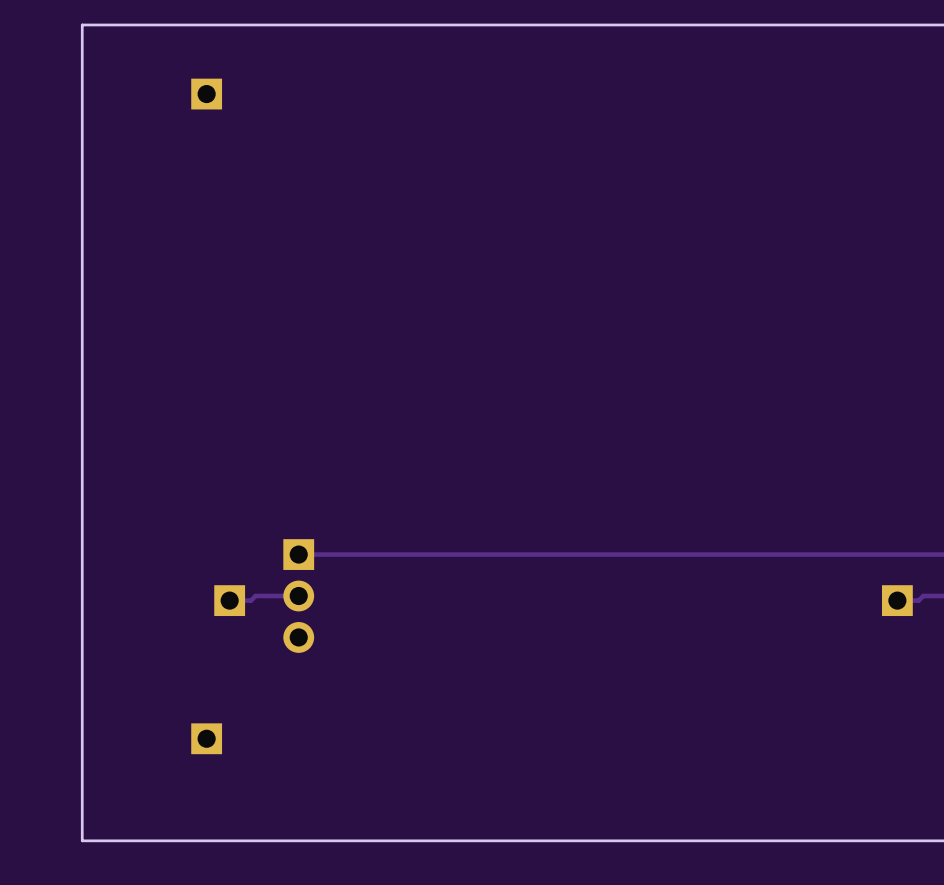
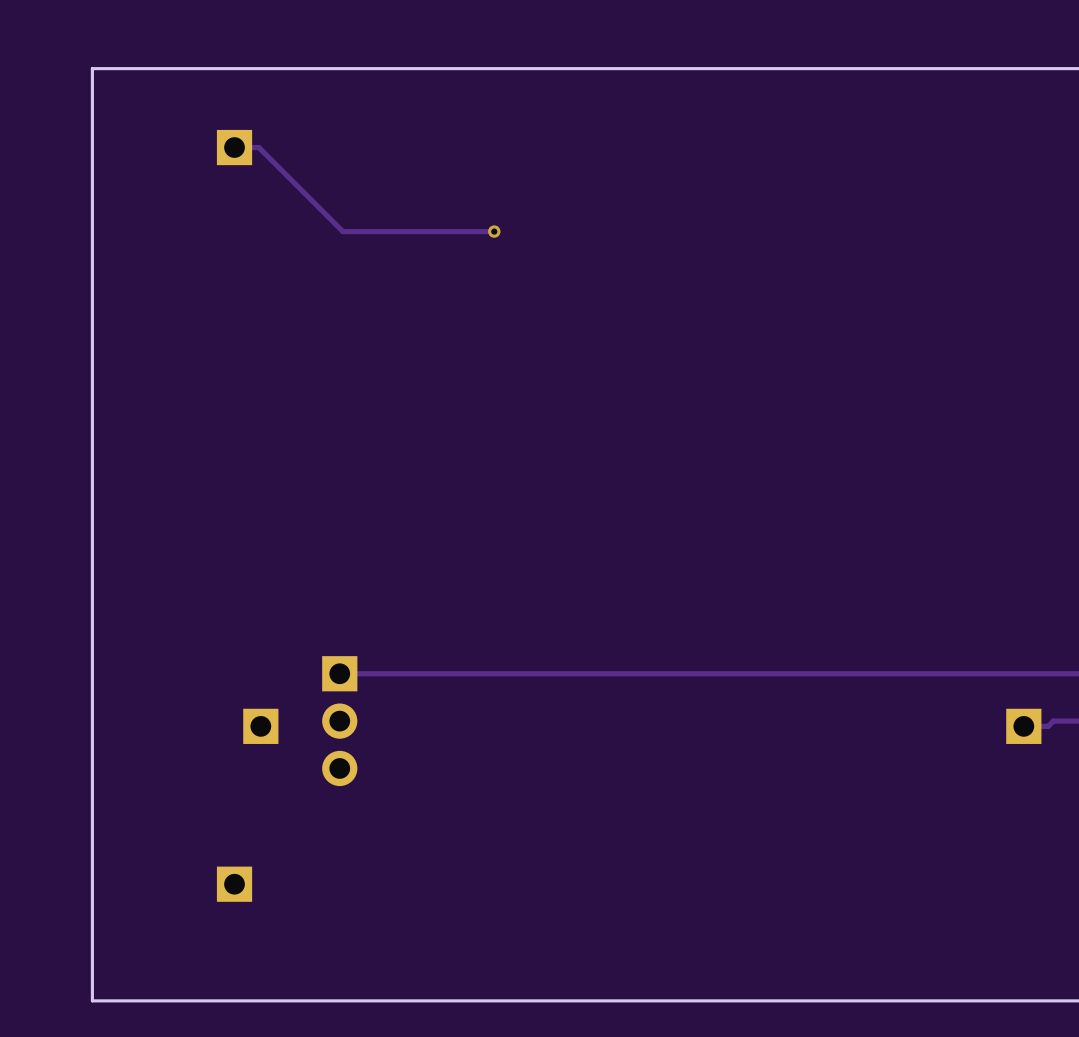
track: none -> (234, 147) (258, 147) (342, 231) (494, 231)
via: none -> (494, 231)
track: (298, 596) (255, 596) (250, 600) (229, 600) -> none

